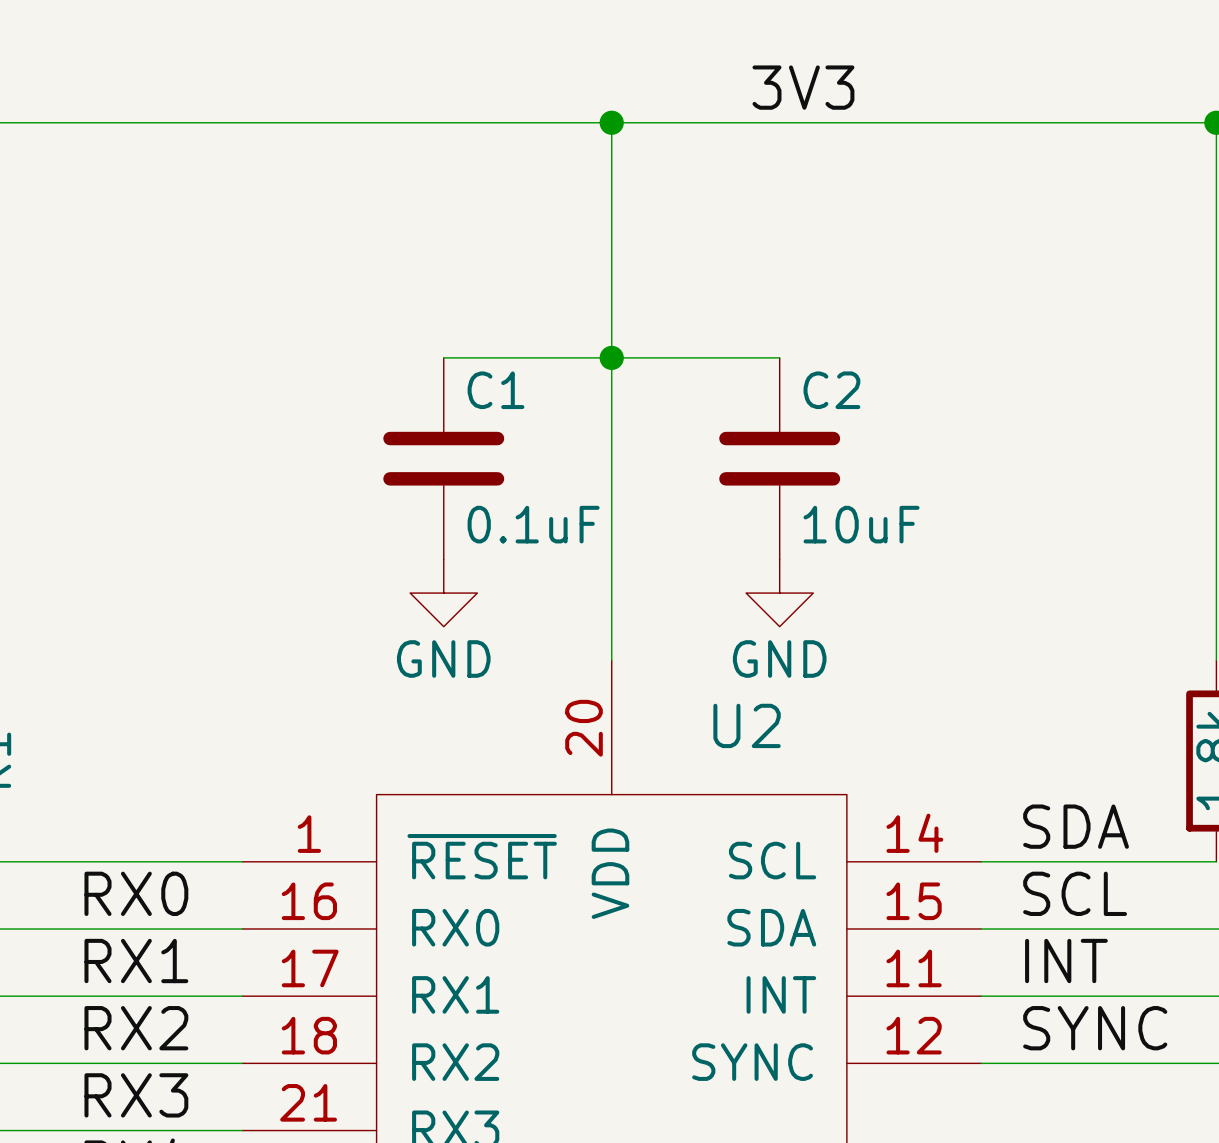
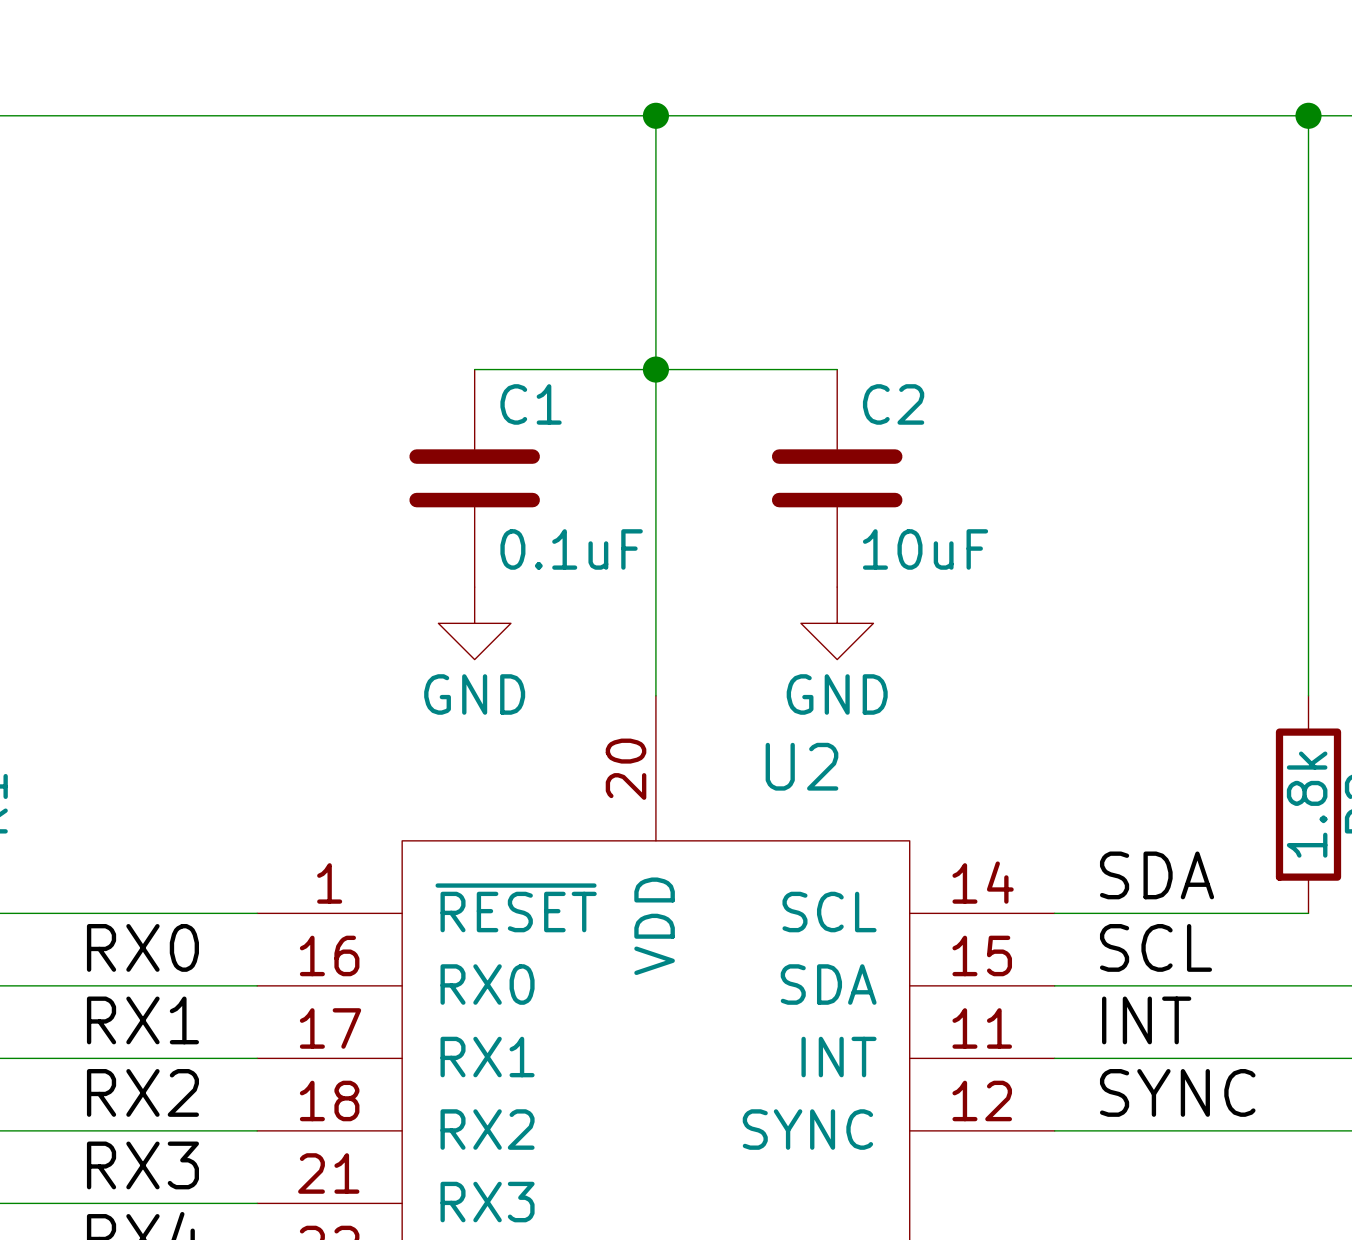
label: 3V3 (803, 87) -> none

